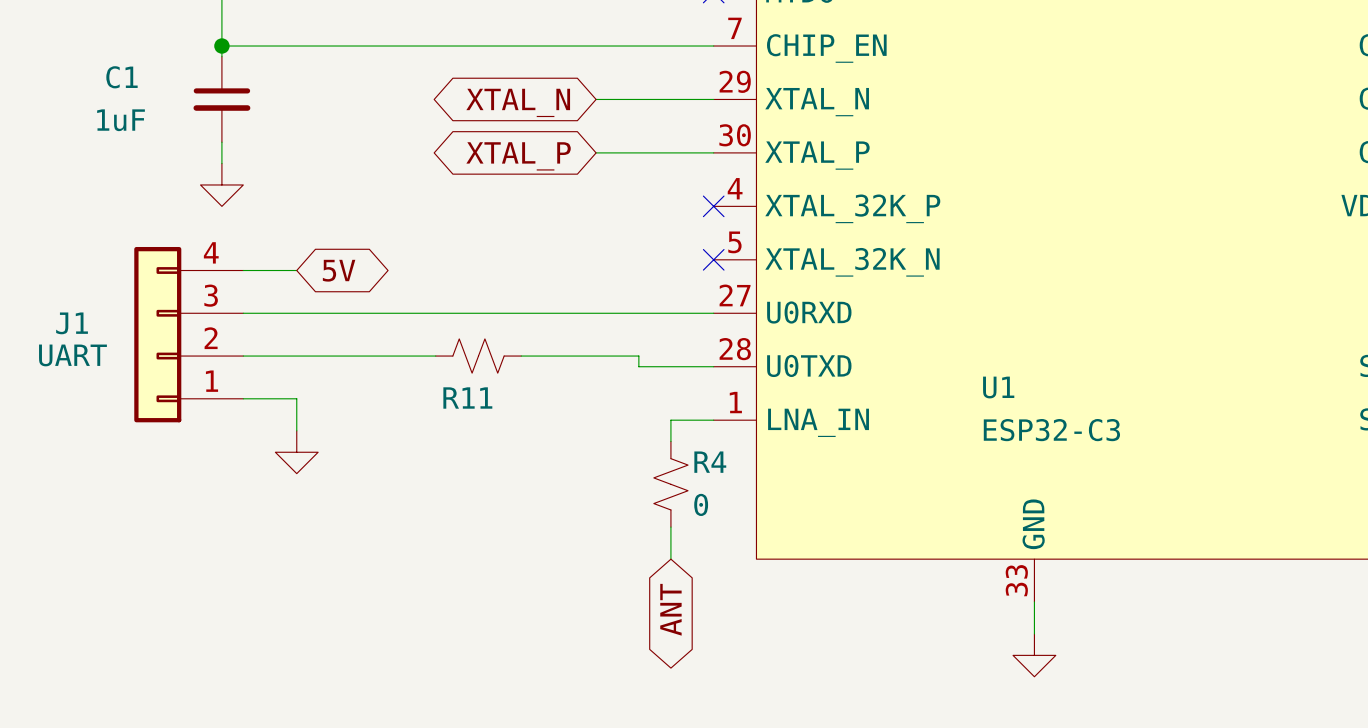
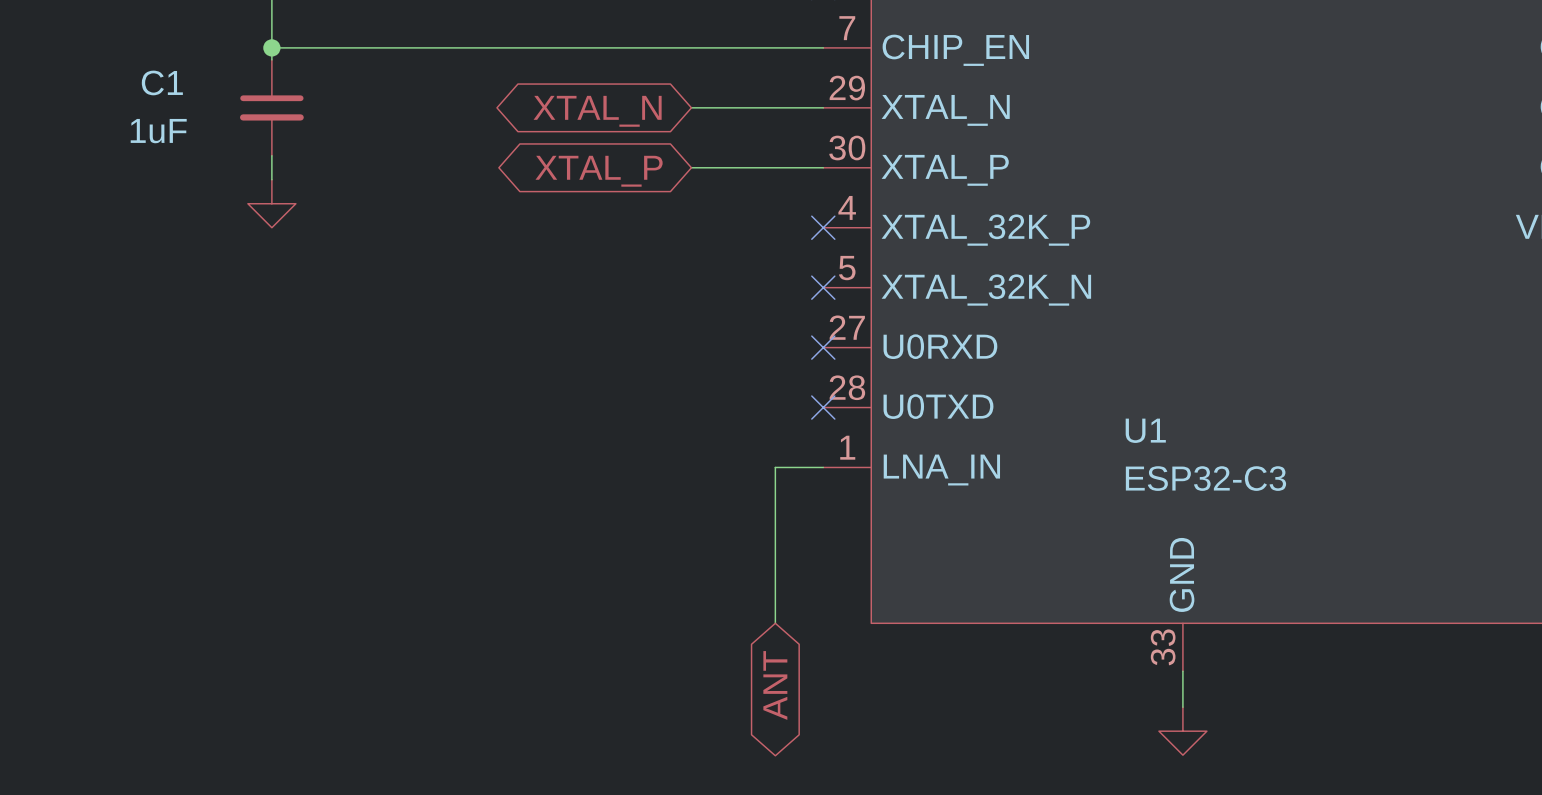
wire: (243, 270) (296, 270) -> none
global label: 5V (339, 270) -> none
wire: (243, 313) (713, 313) -> none
no-connect mark: none -> (823, 347)
J1: UART (188, 334) -> none
wire: (243, 356) (435, 356) -> none
R11: (478, 356) -> none
wire: (521, 356) (638, 356) (638, 366) (713, 366) -> none
no-connect mark: none -> (823, 407)
wire: (243, 398) (296, 398) (296, 430) -> none
wire: none -> (775, 491) (775, 587)
power symbol: (296, 452) -> none
R4: 0 (670, 484) -> none

